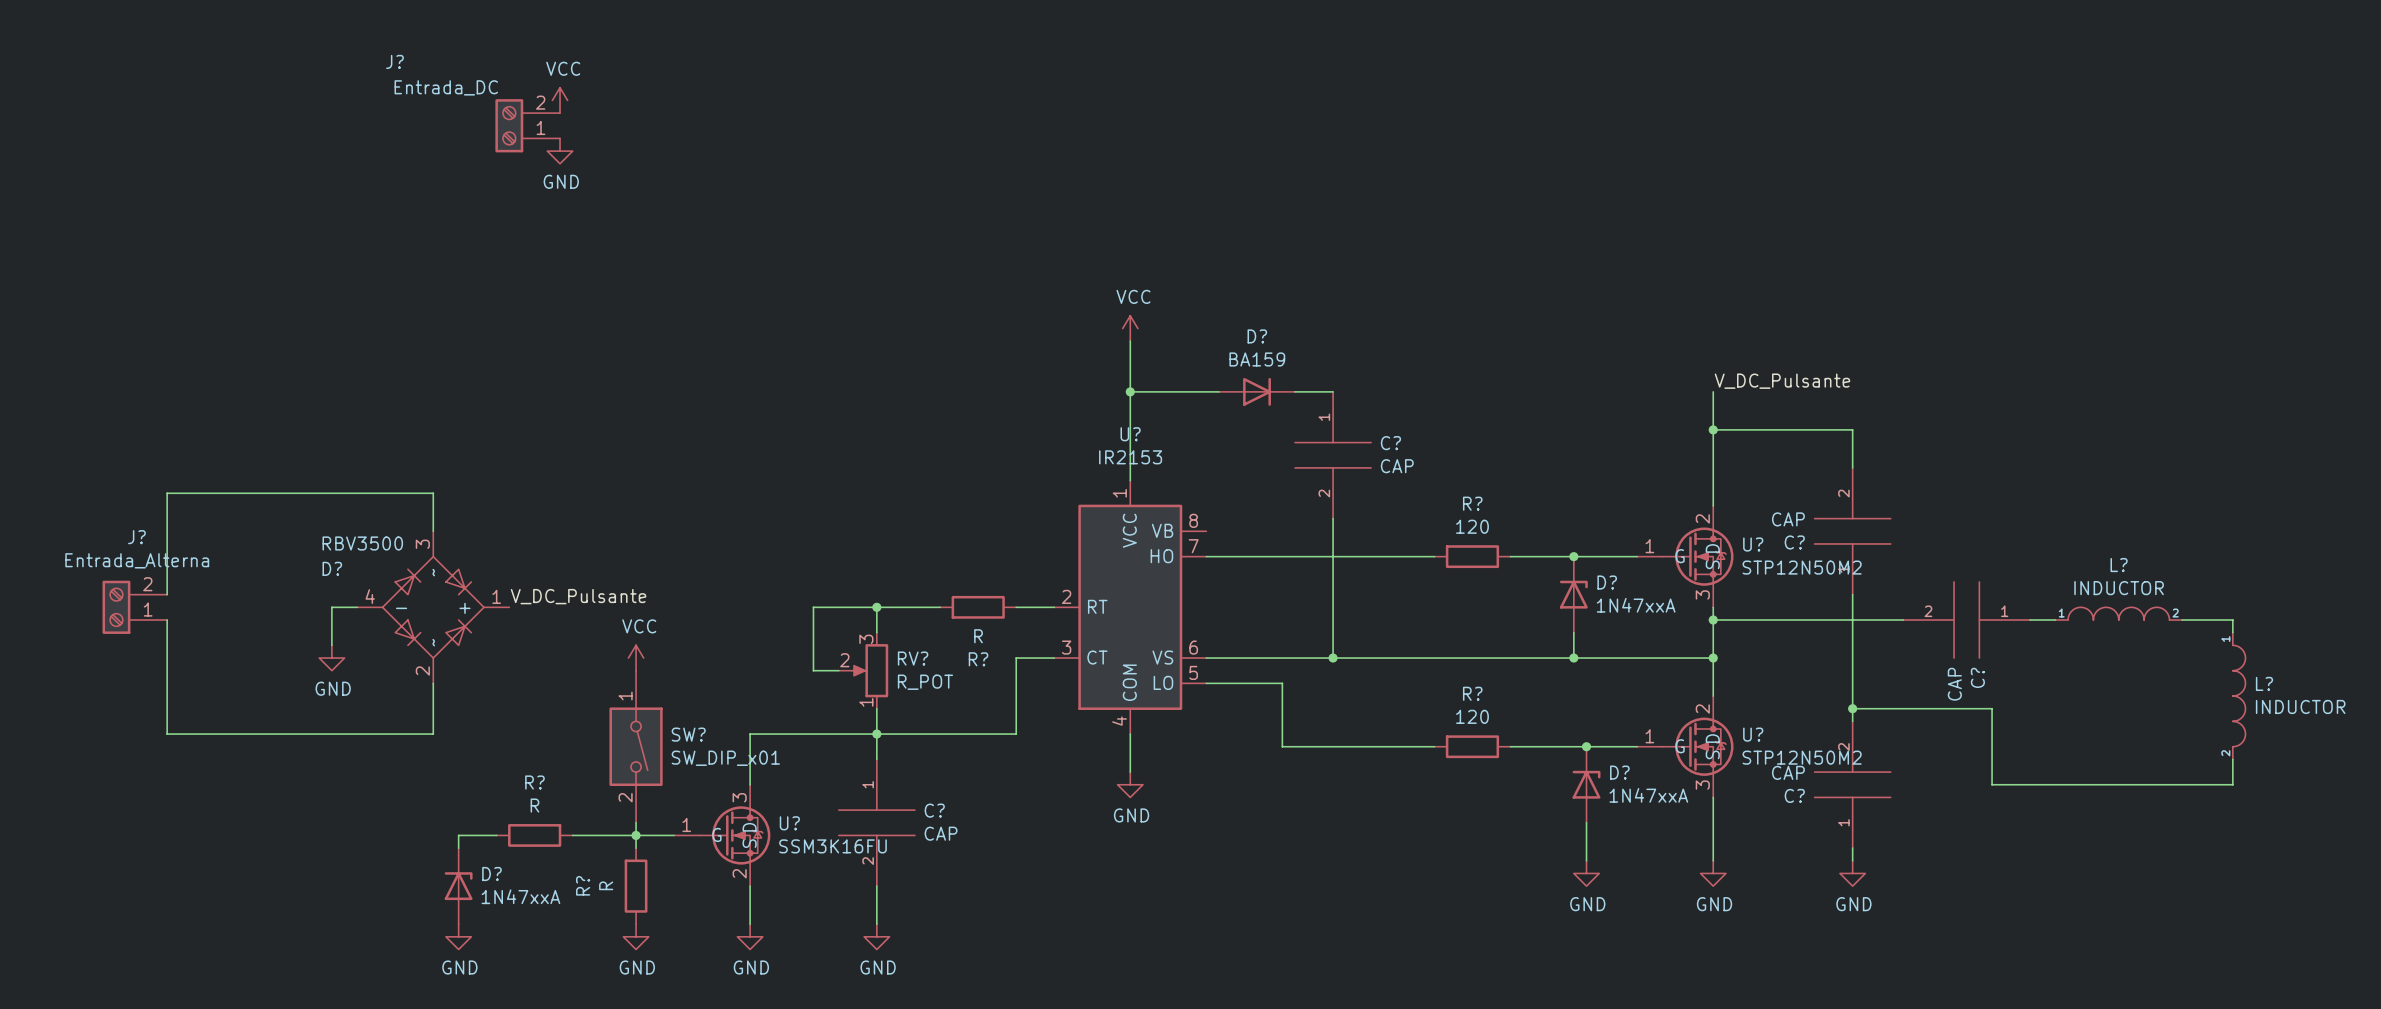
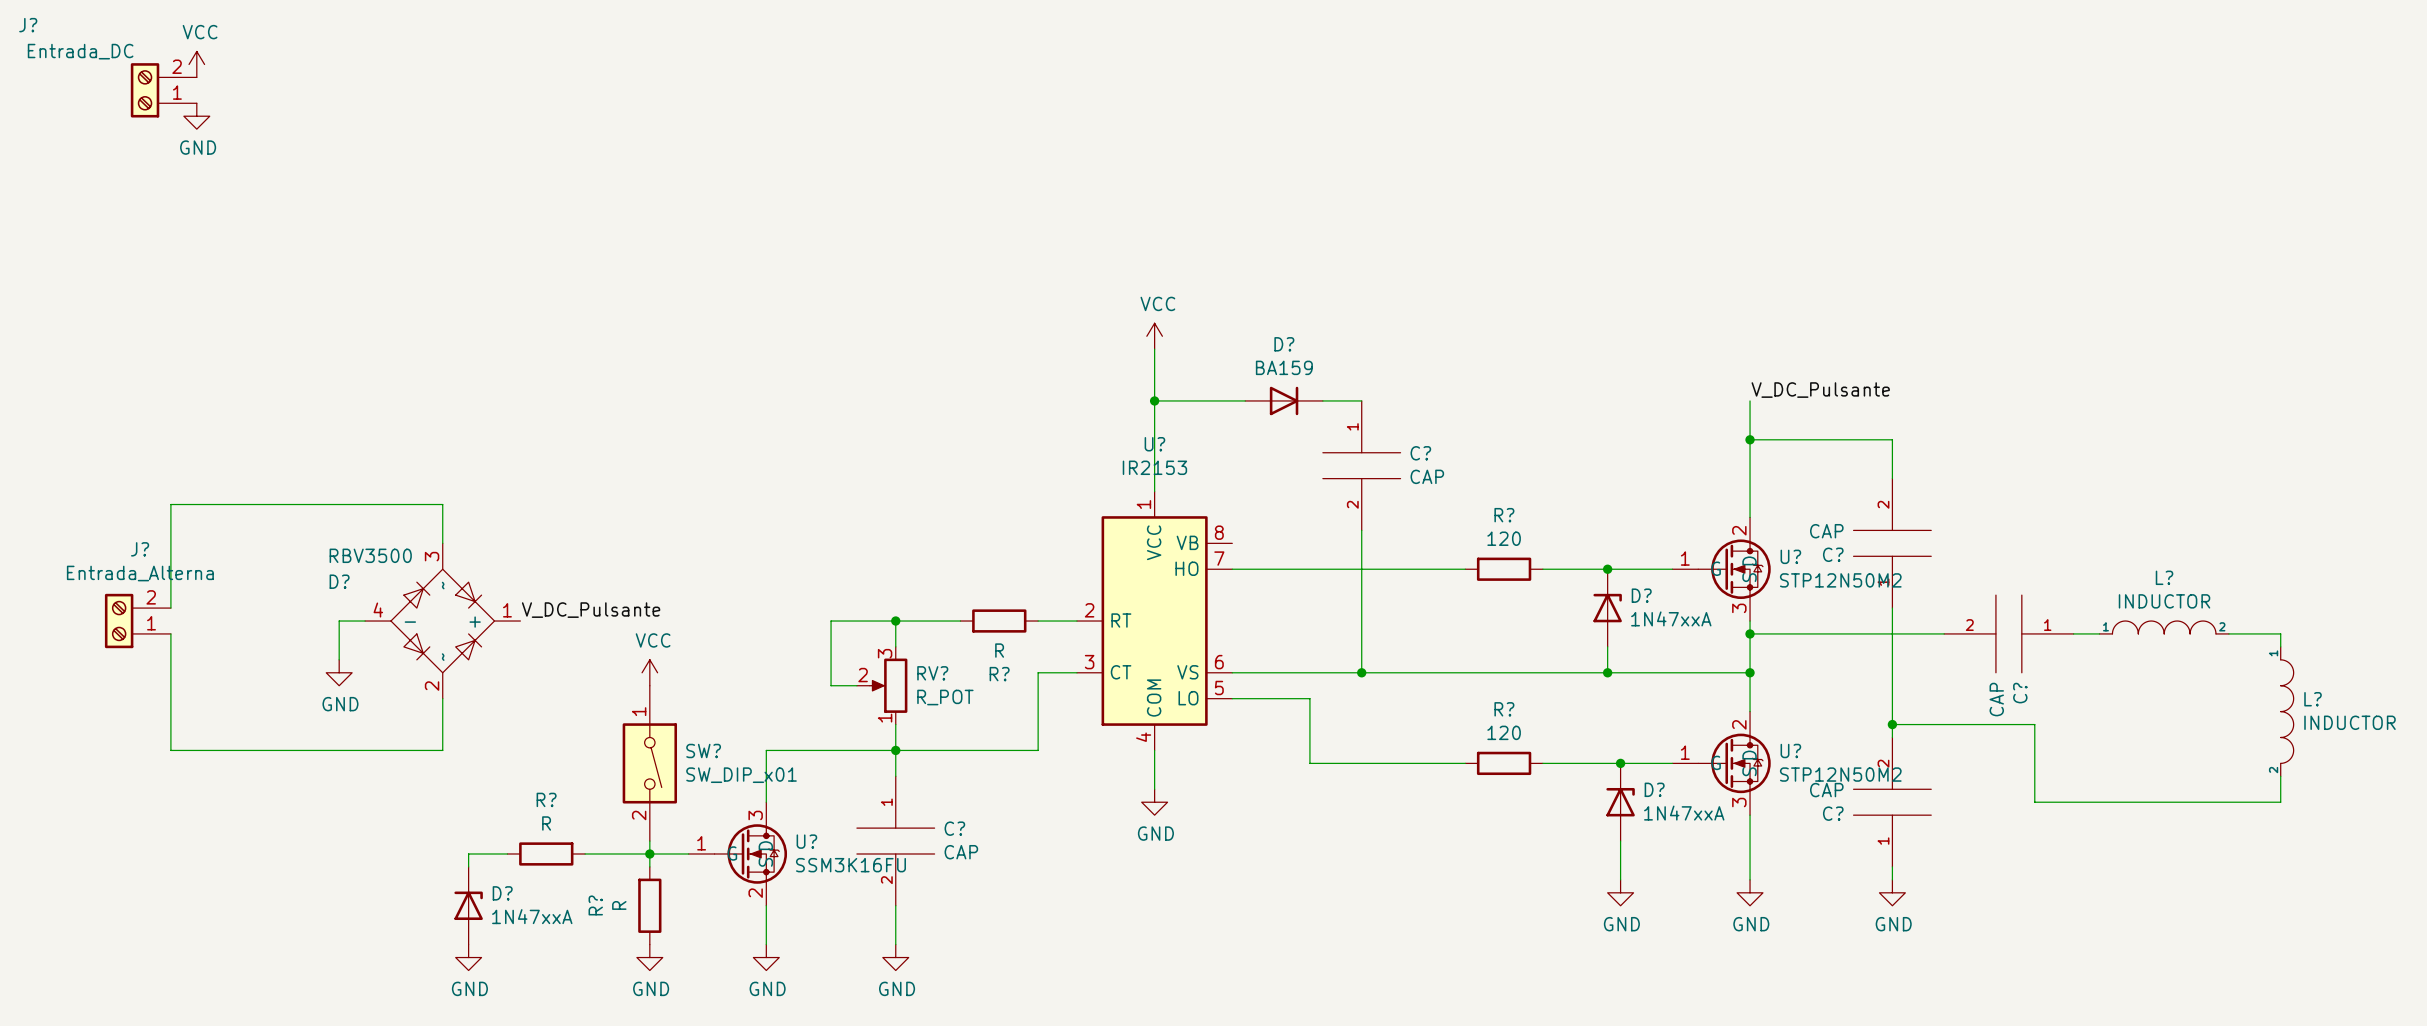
power symbol: none -> VCC (196, 64)
J?: none -> Entrada_DC (163, 90)
power symbol: VCC (560, 100) -> none
power symbol: none -> GND (196, 116)
J?: Entrada_DC (527, 125) -> none
power symbol: GND (560, 151) -> none

